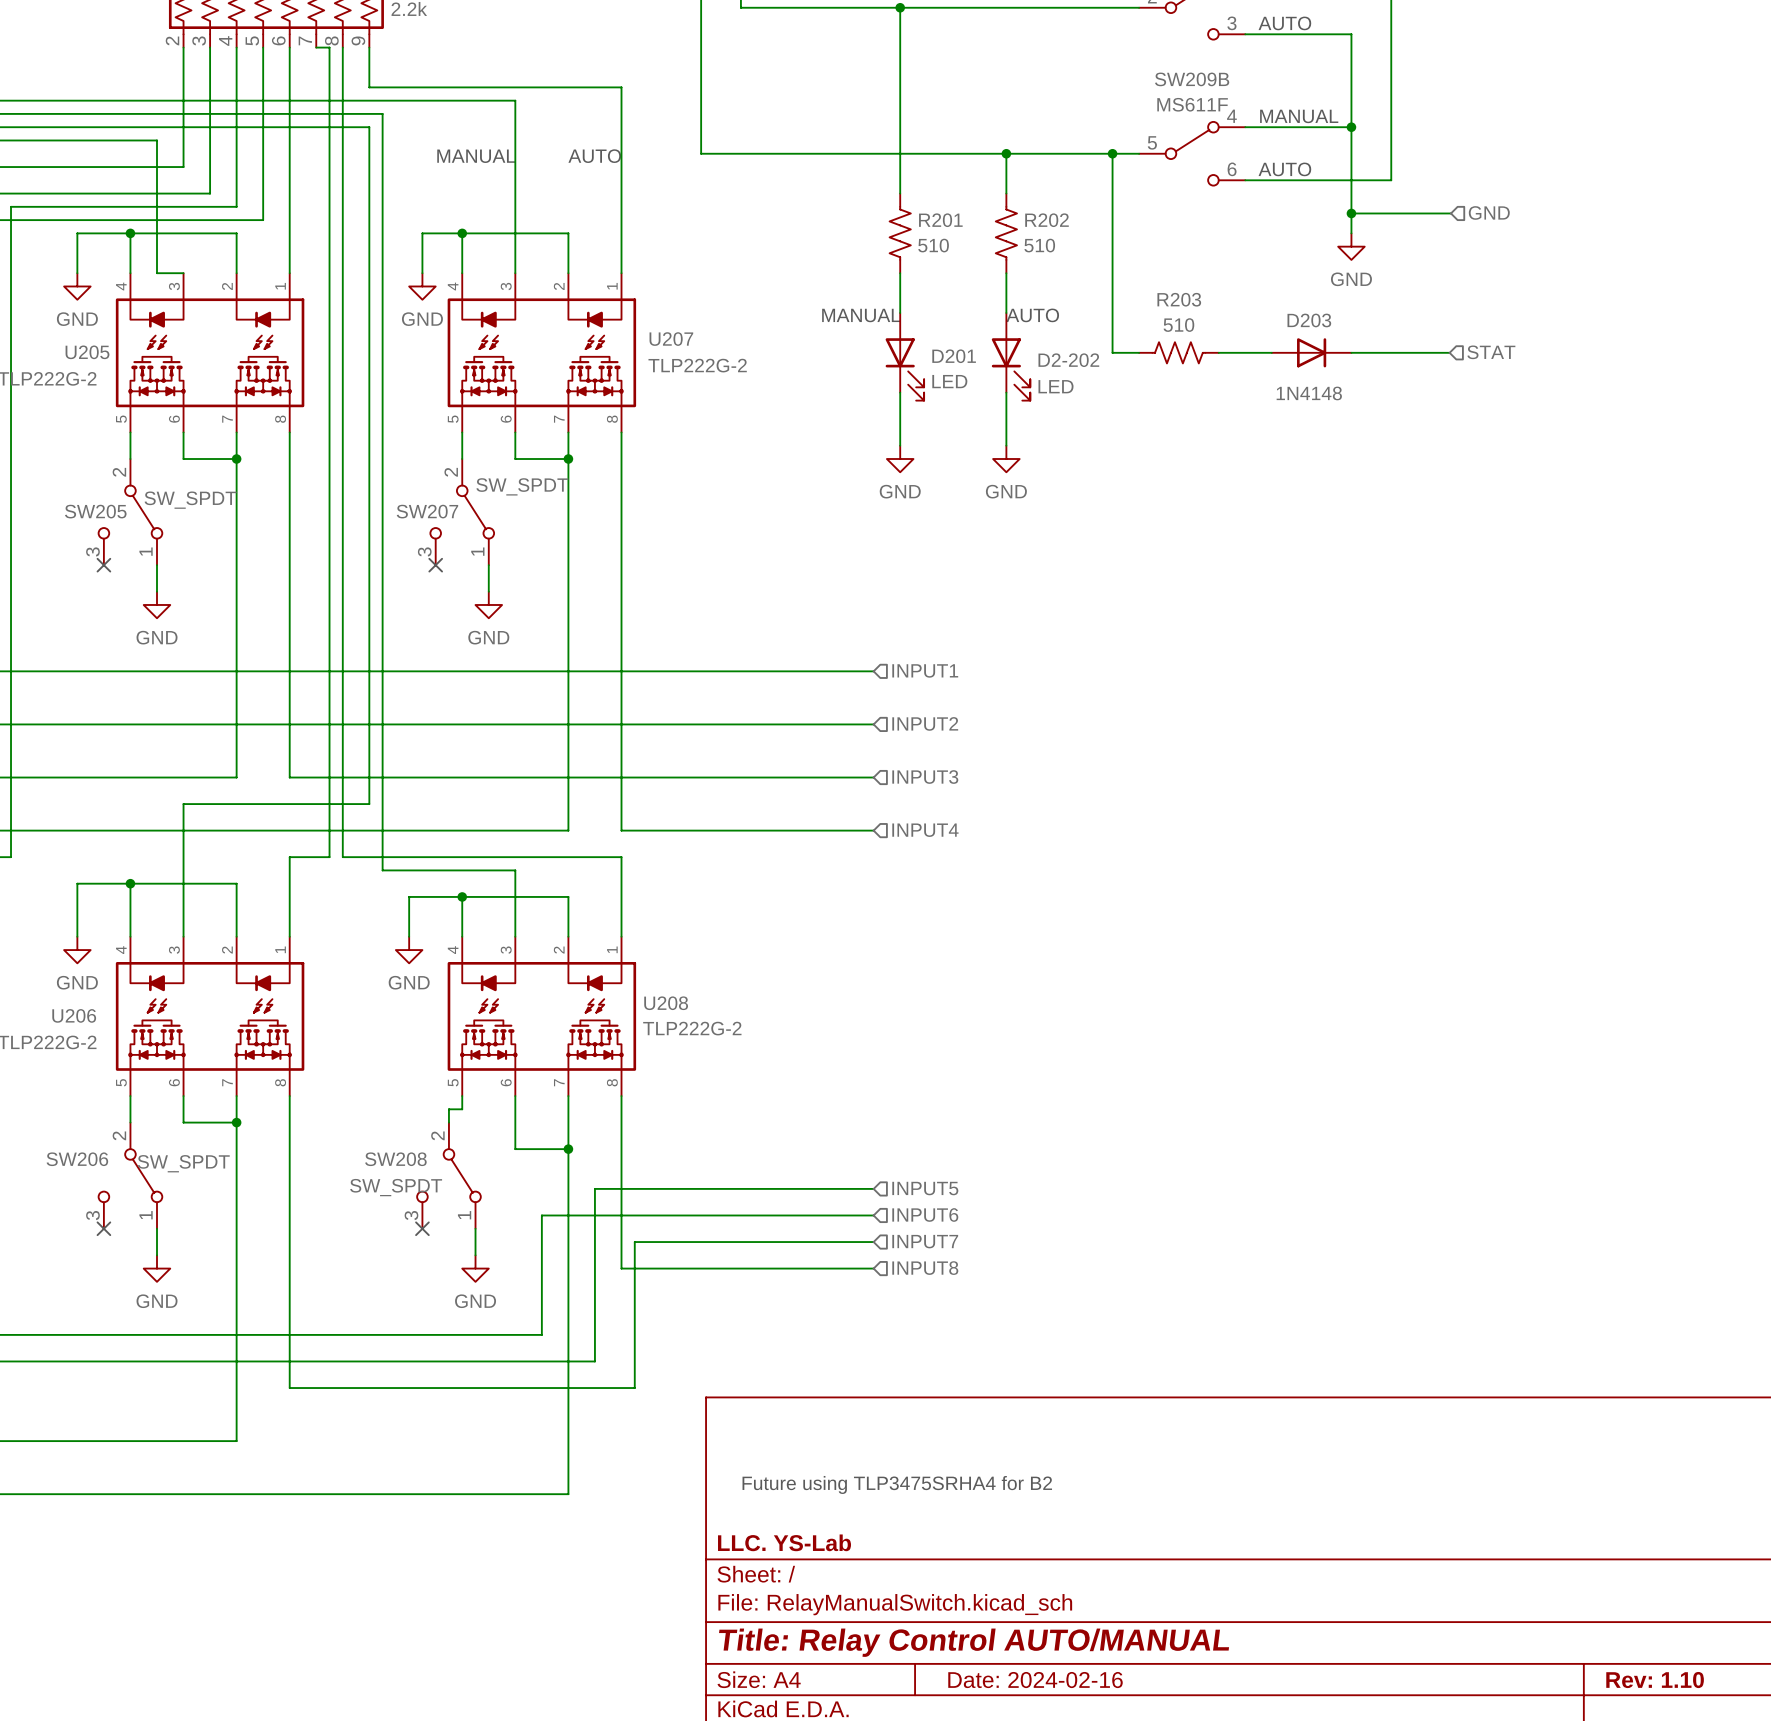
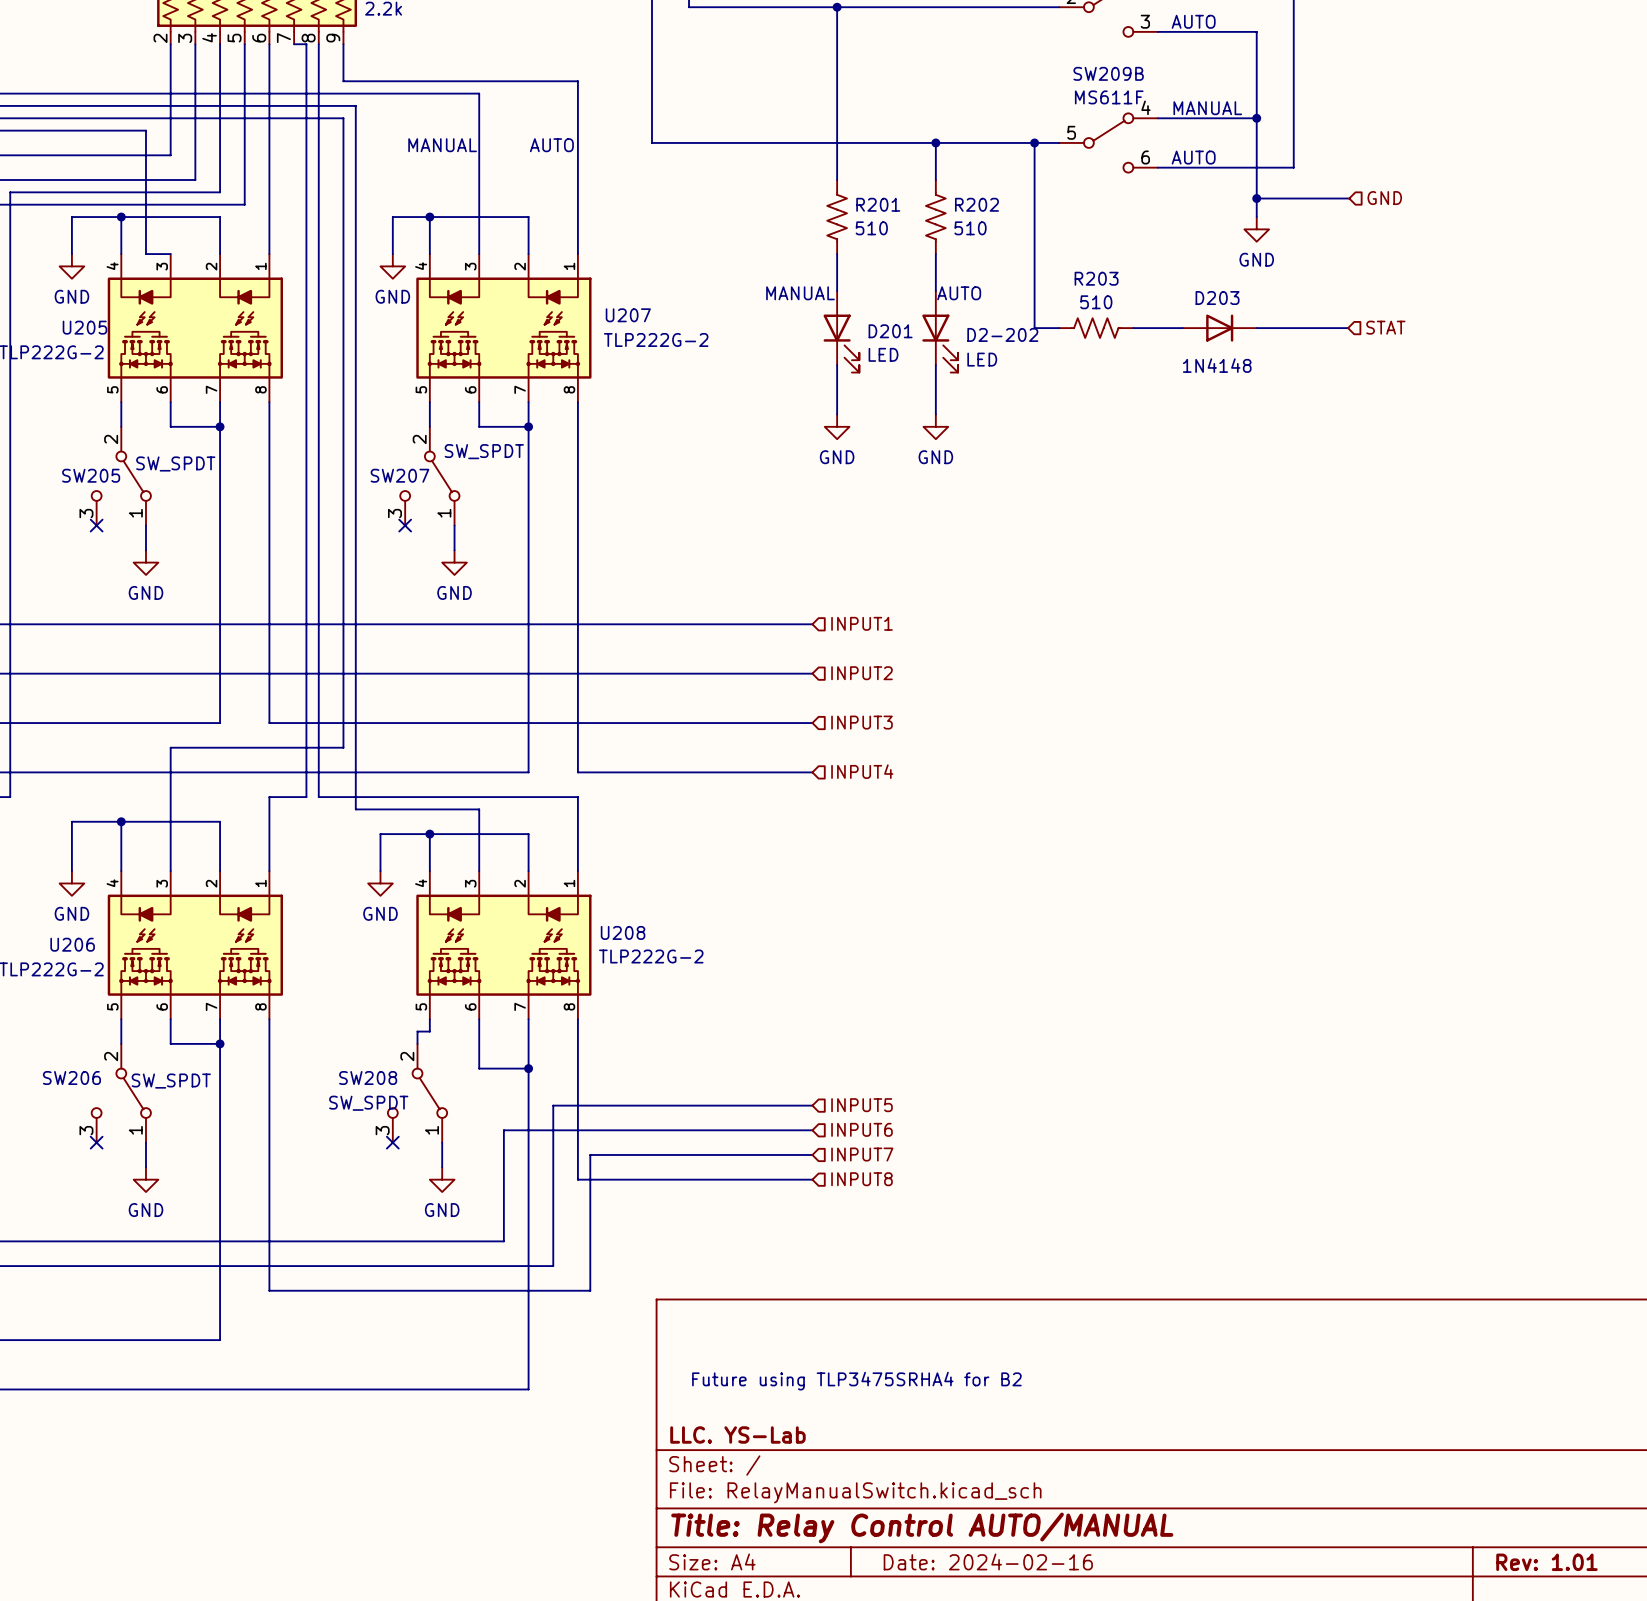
title block: Rev: 1.10 (1655, 1680) -> Rev: 1.01 (1546, 1562)

